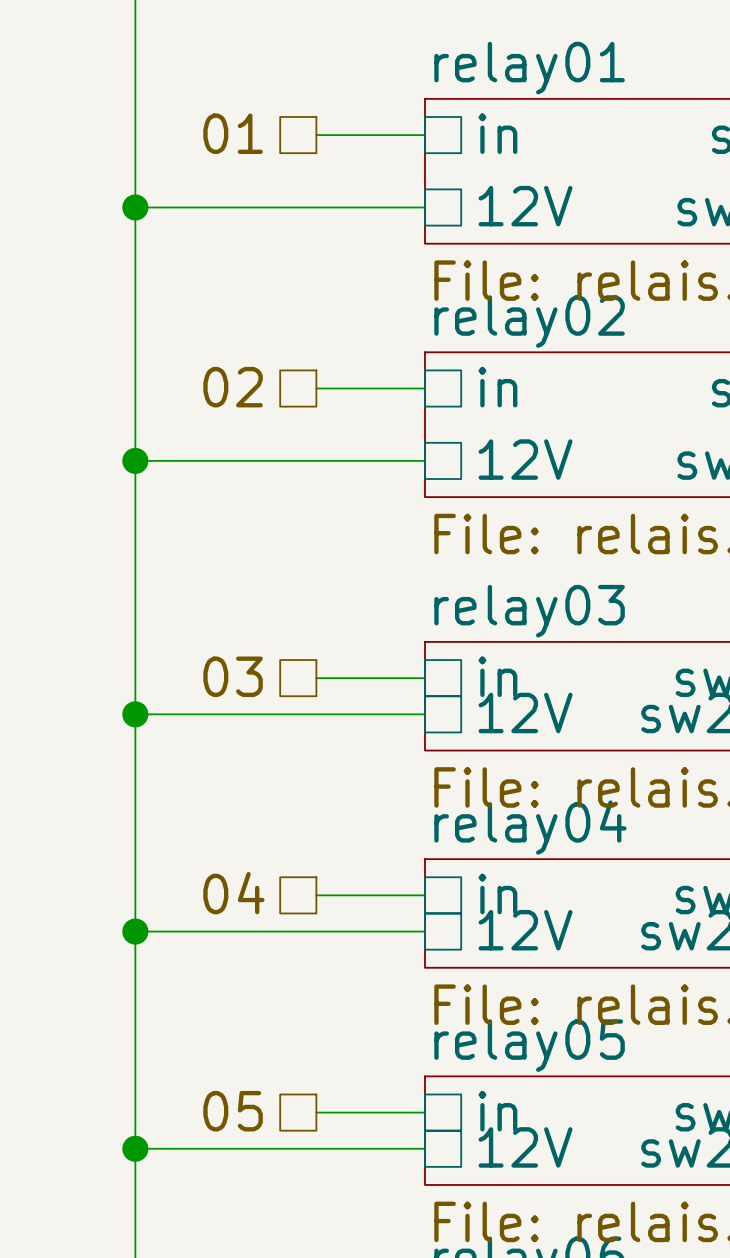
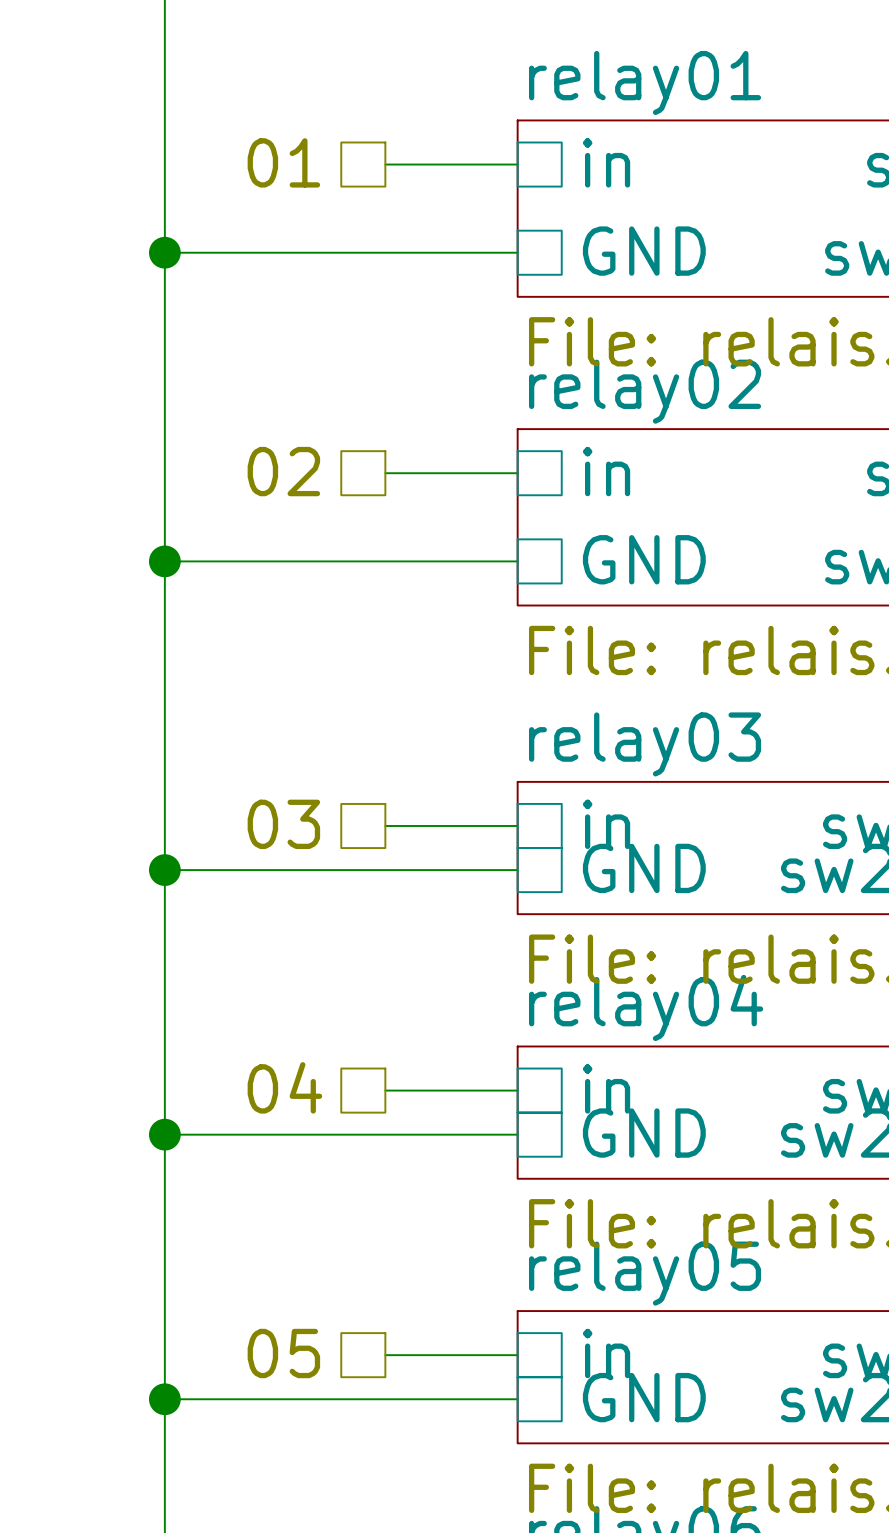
sheet pin: 12V (525, 206) -> GND (644, 251)
sheet pin: 12V (525, 459) -> GND (644, 559)
sheet pin: 12V (525, 712) -> GND (644, 868)
sheet pin: 12V (525, 930) -> GND (644, 1133)
sheet pin: 12V (525, 1147) -> GND (644, 1397)

